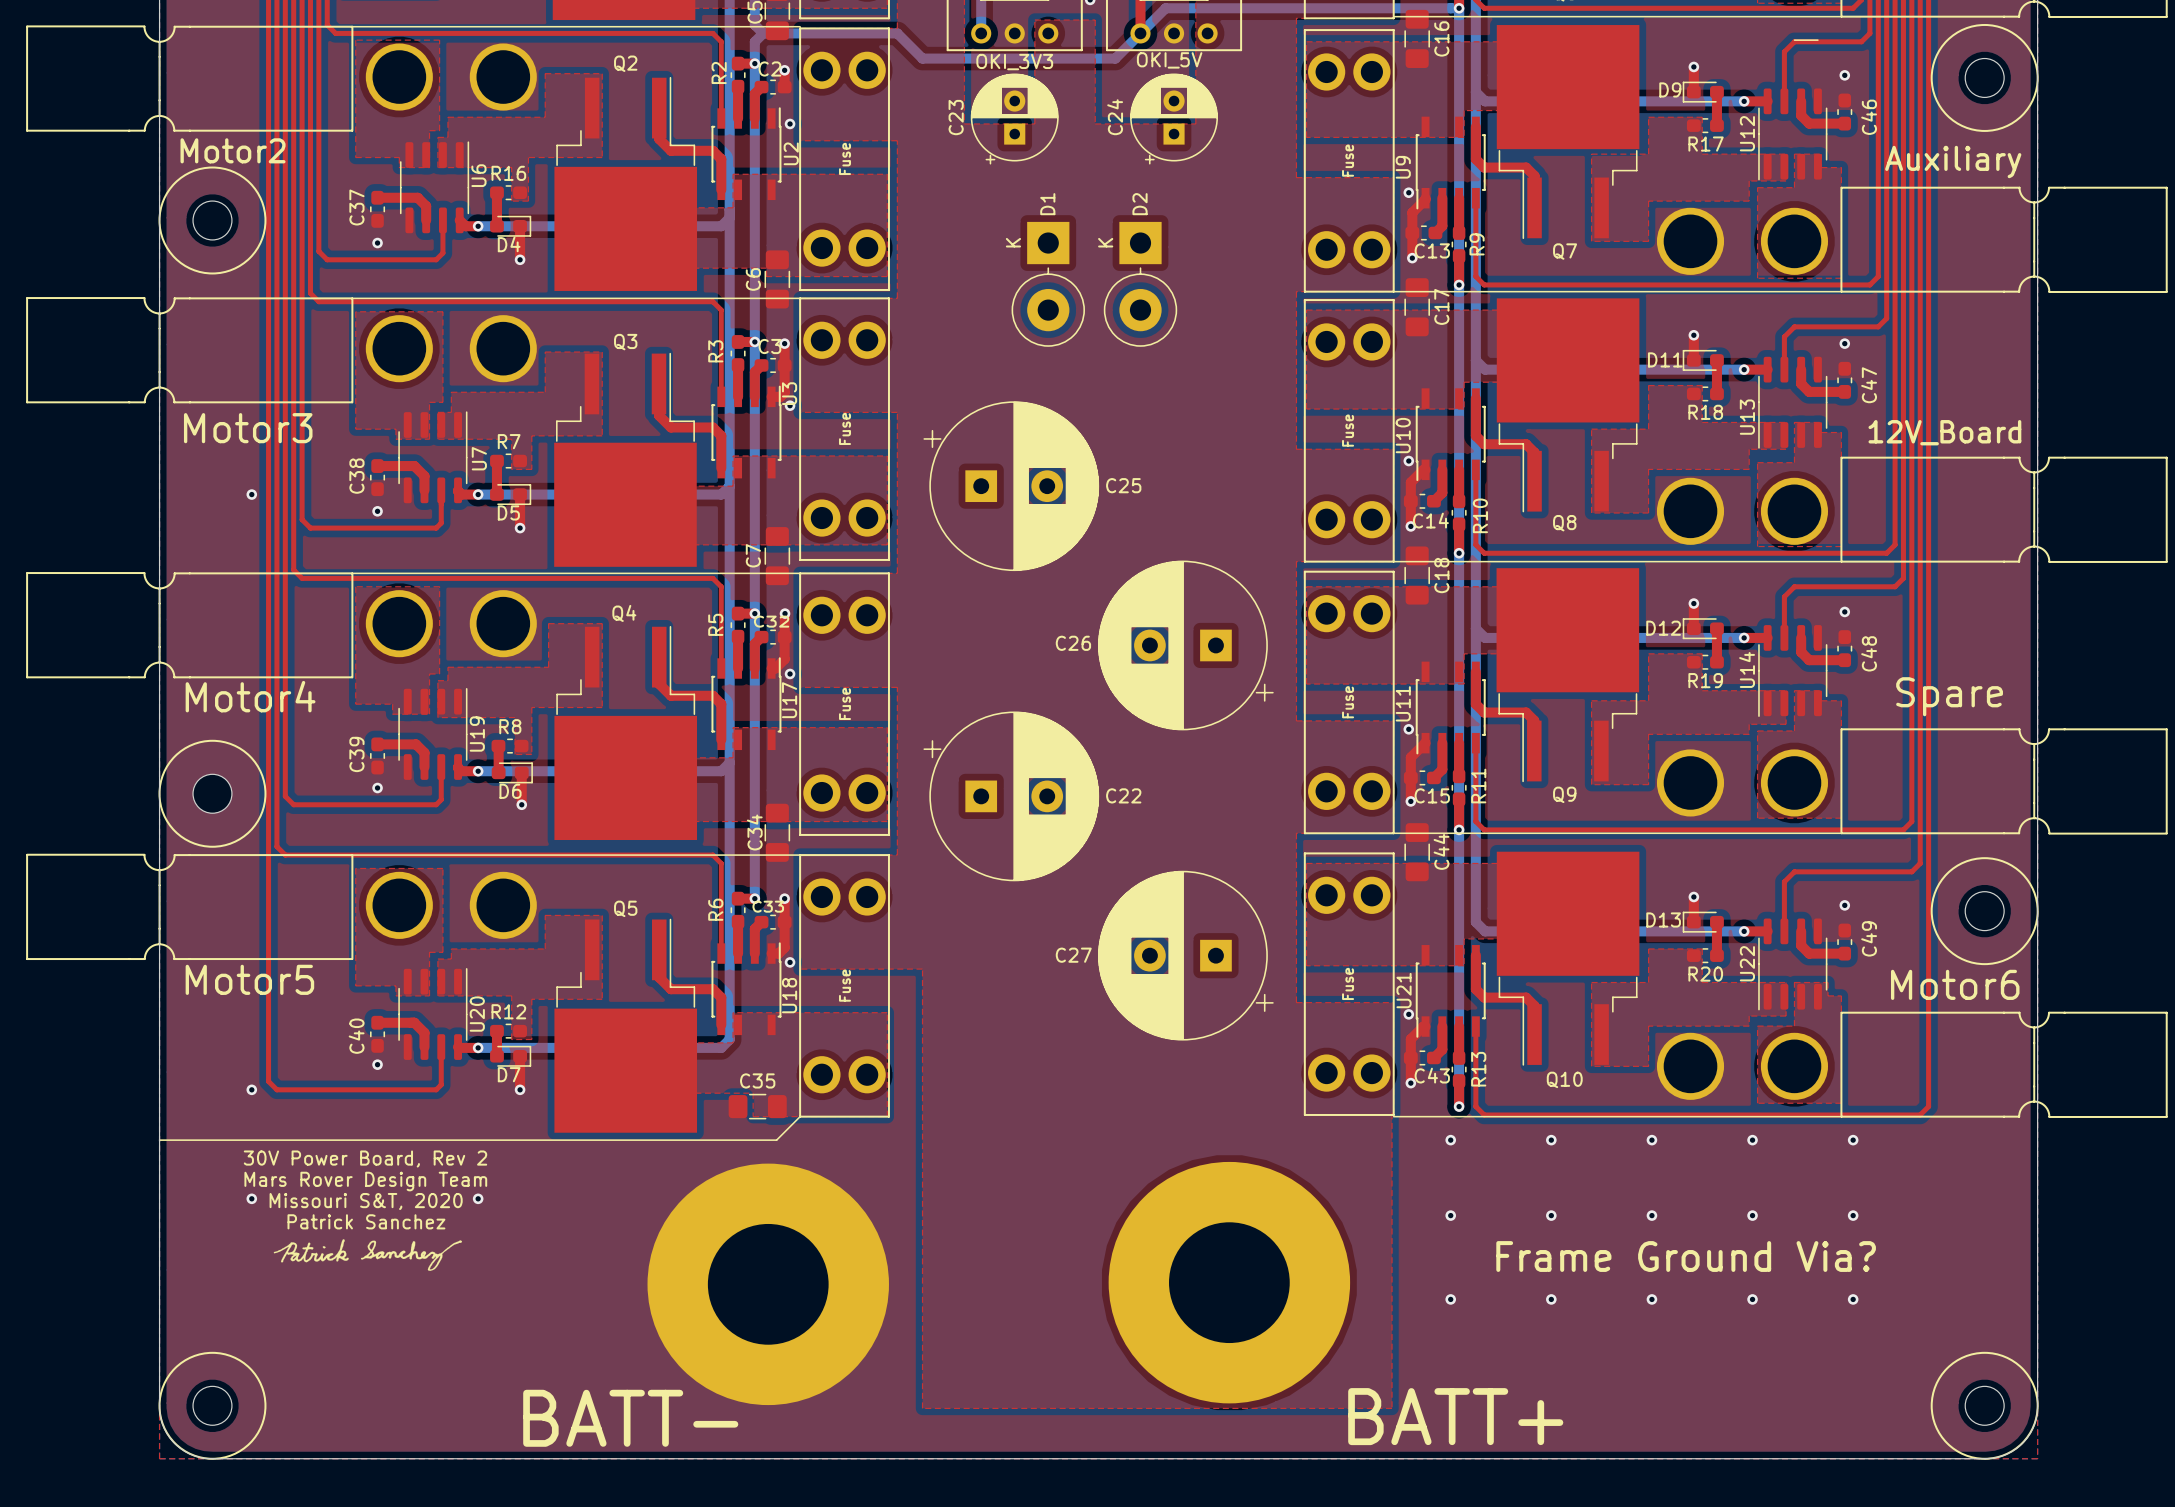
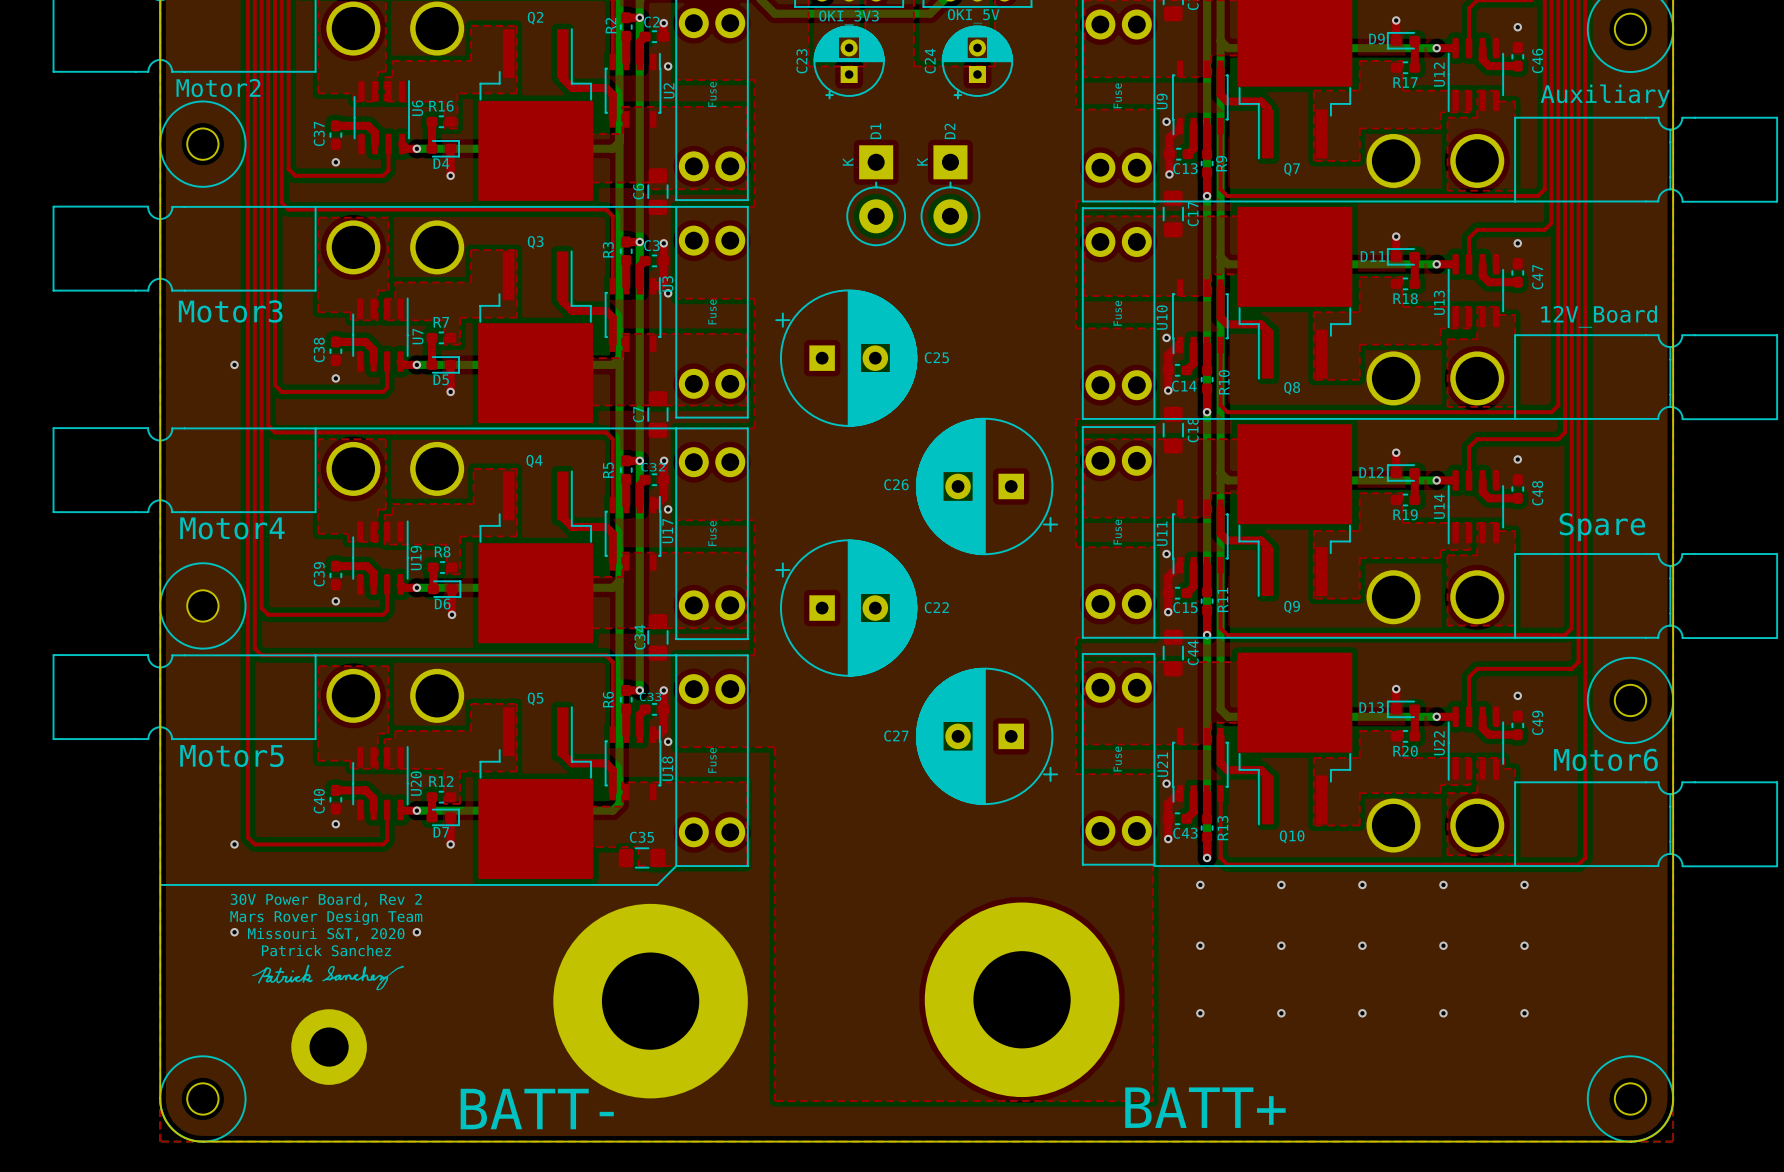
text: Frame Ground Via? (1686, 1256) -> none
part: none -> (329, 1047)

